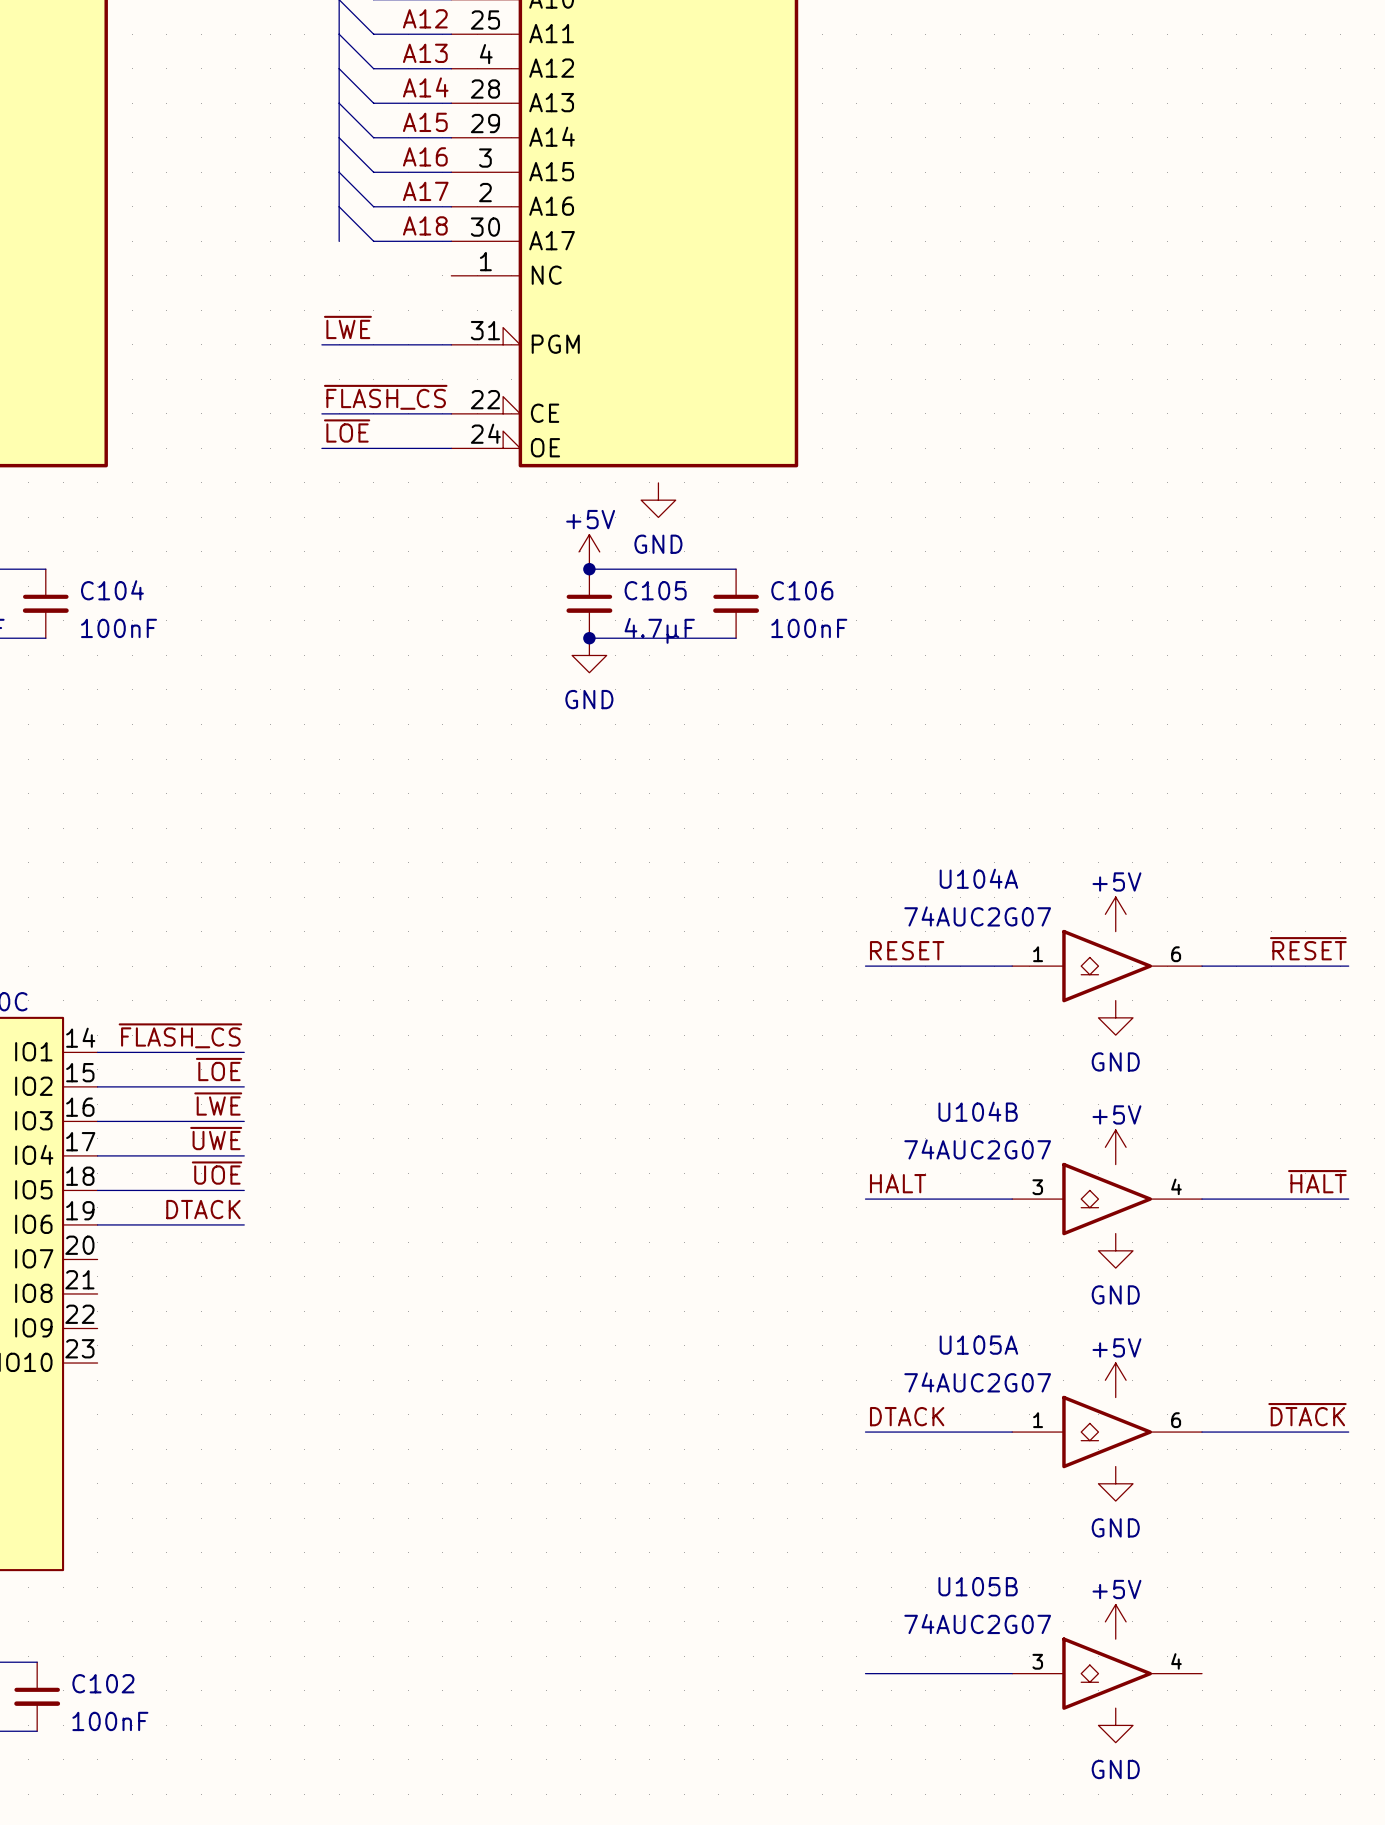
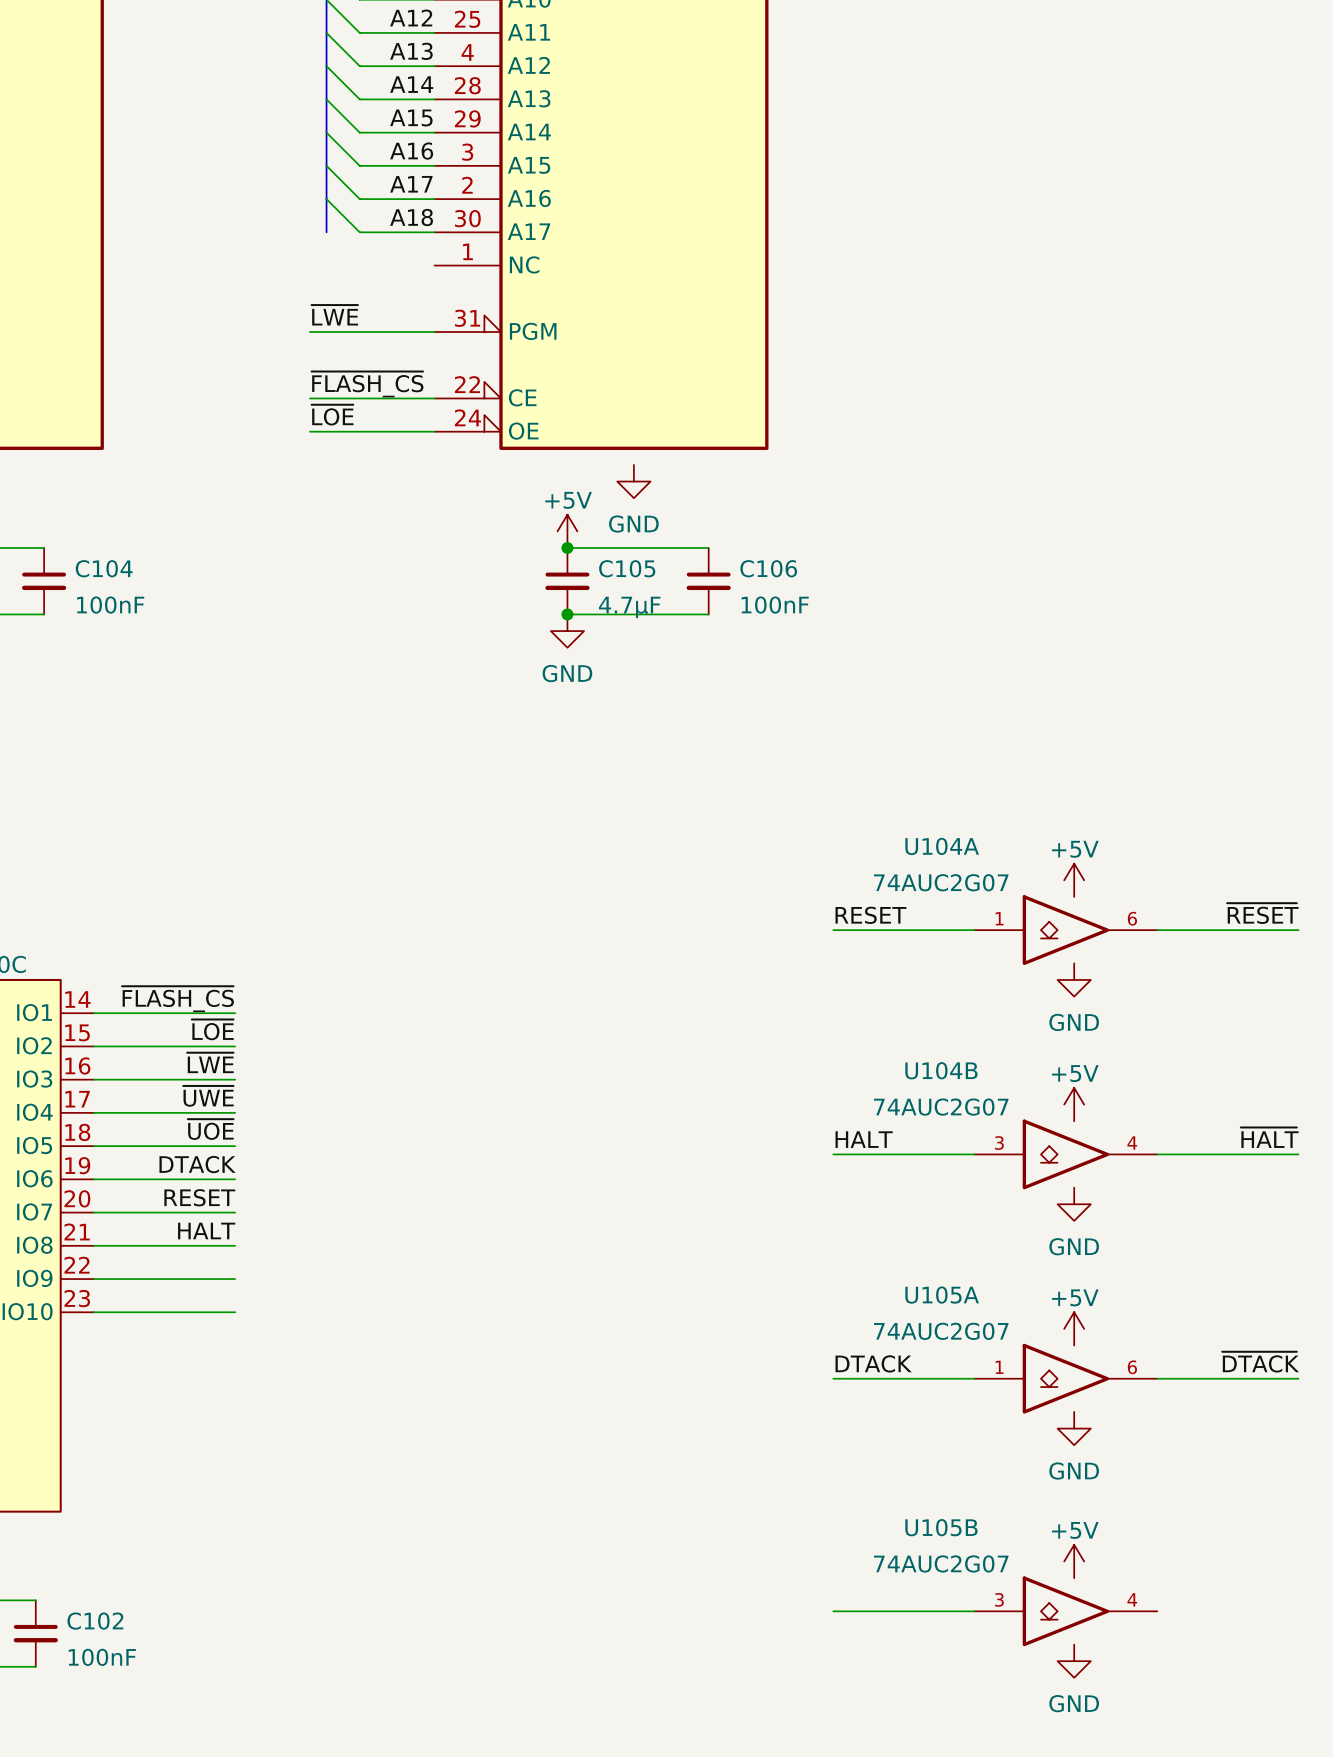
label: none -> RESET (199, 1197)
wire: none -> (93, 1212) (235, 1212)
label: none -> HALT (206, 1230)
wire: none -> (93, 1245) (235, 1245)
wire: none -> (93, 1279) (235, 1279)
wire: none -> (93, 1312) (235, 1312)

